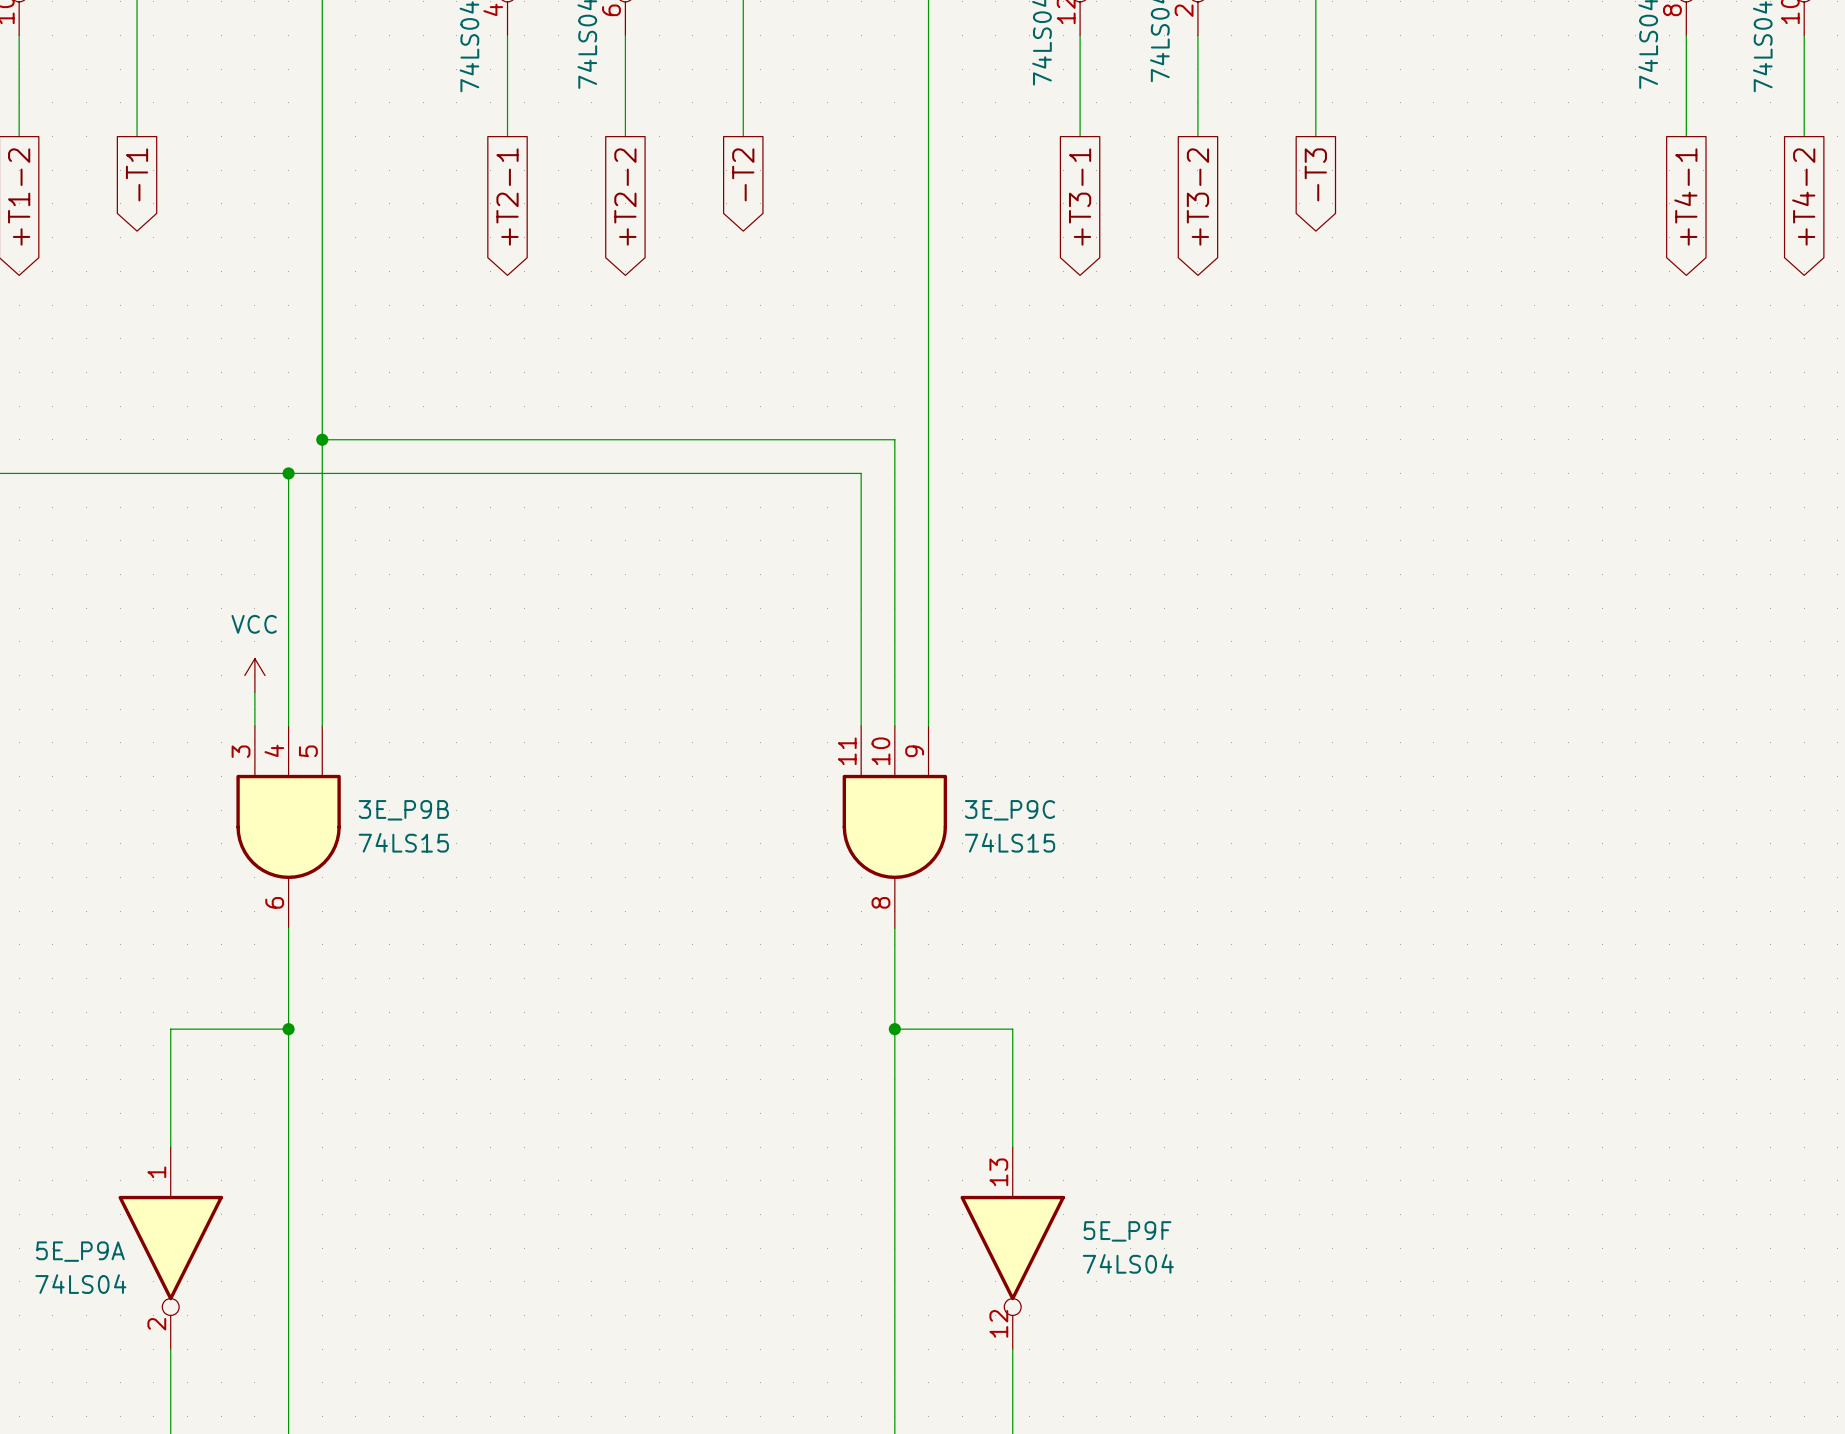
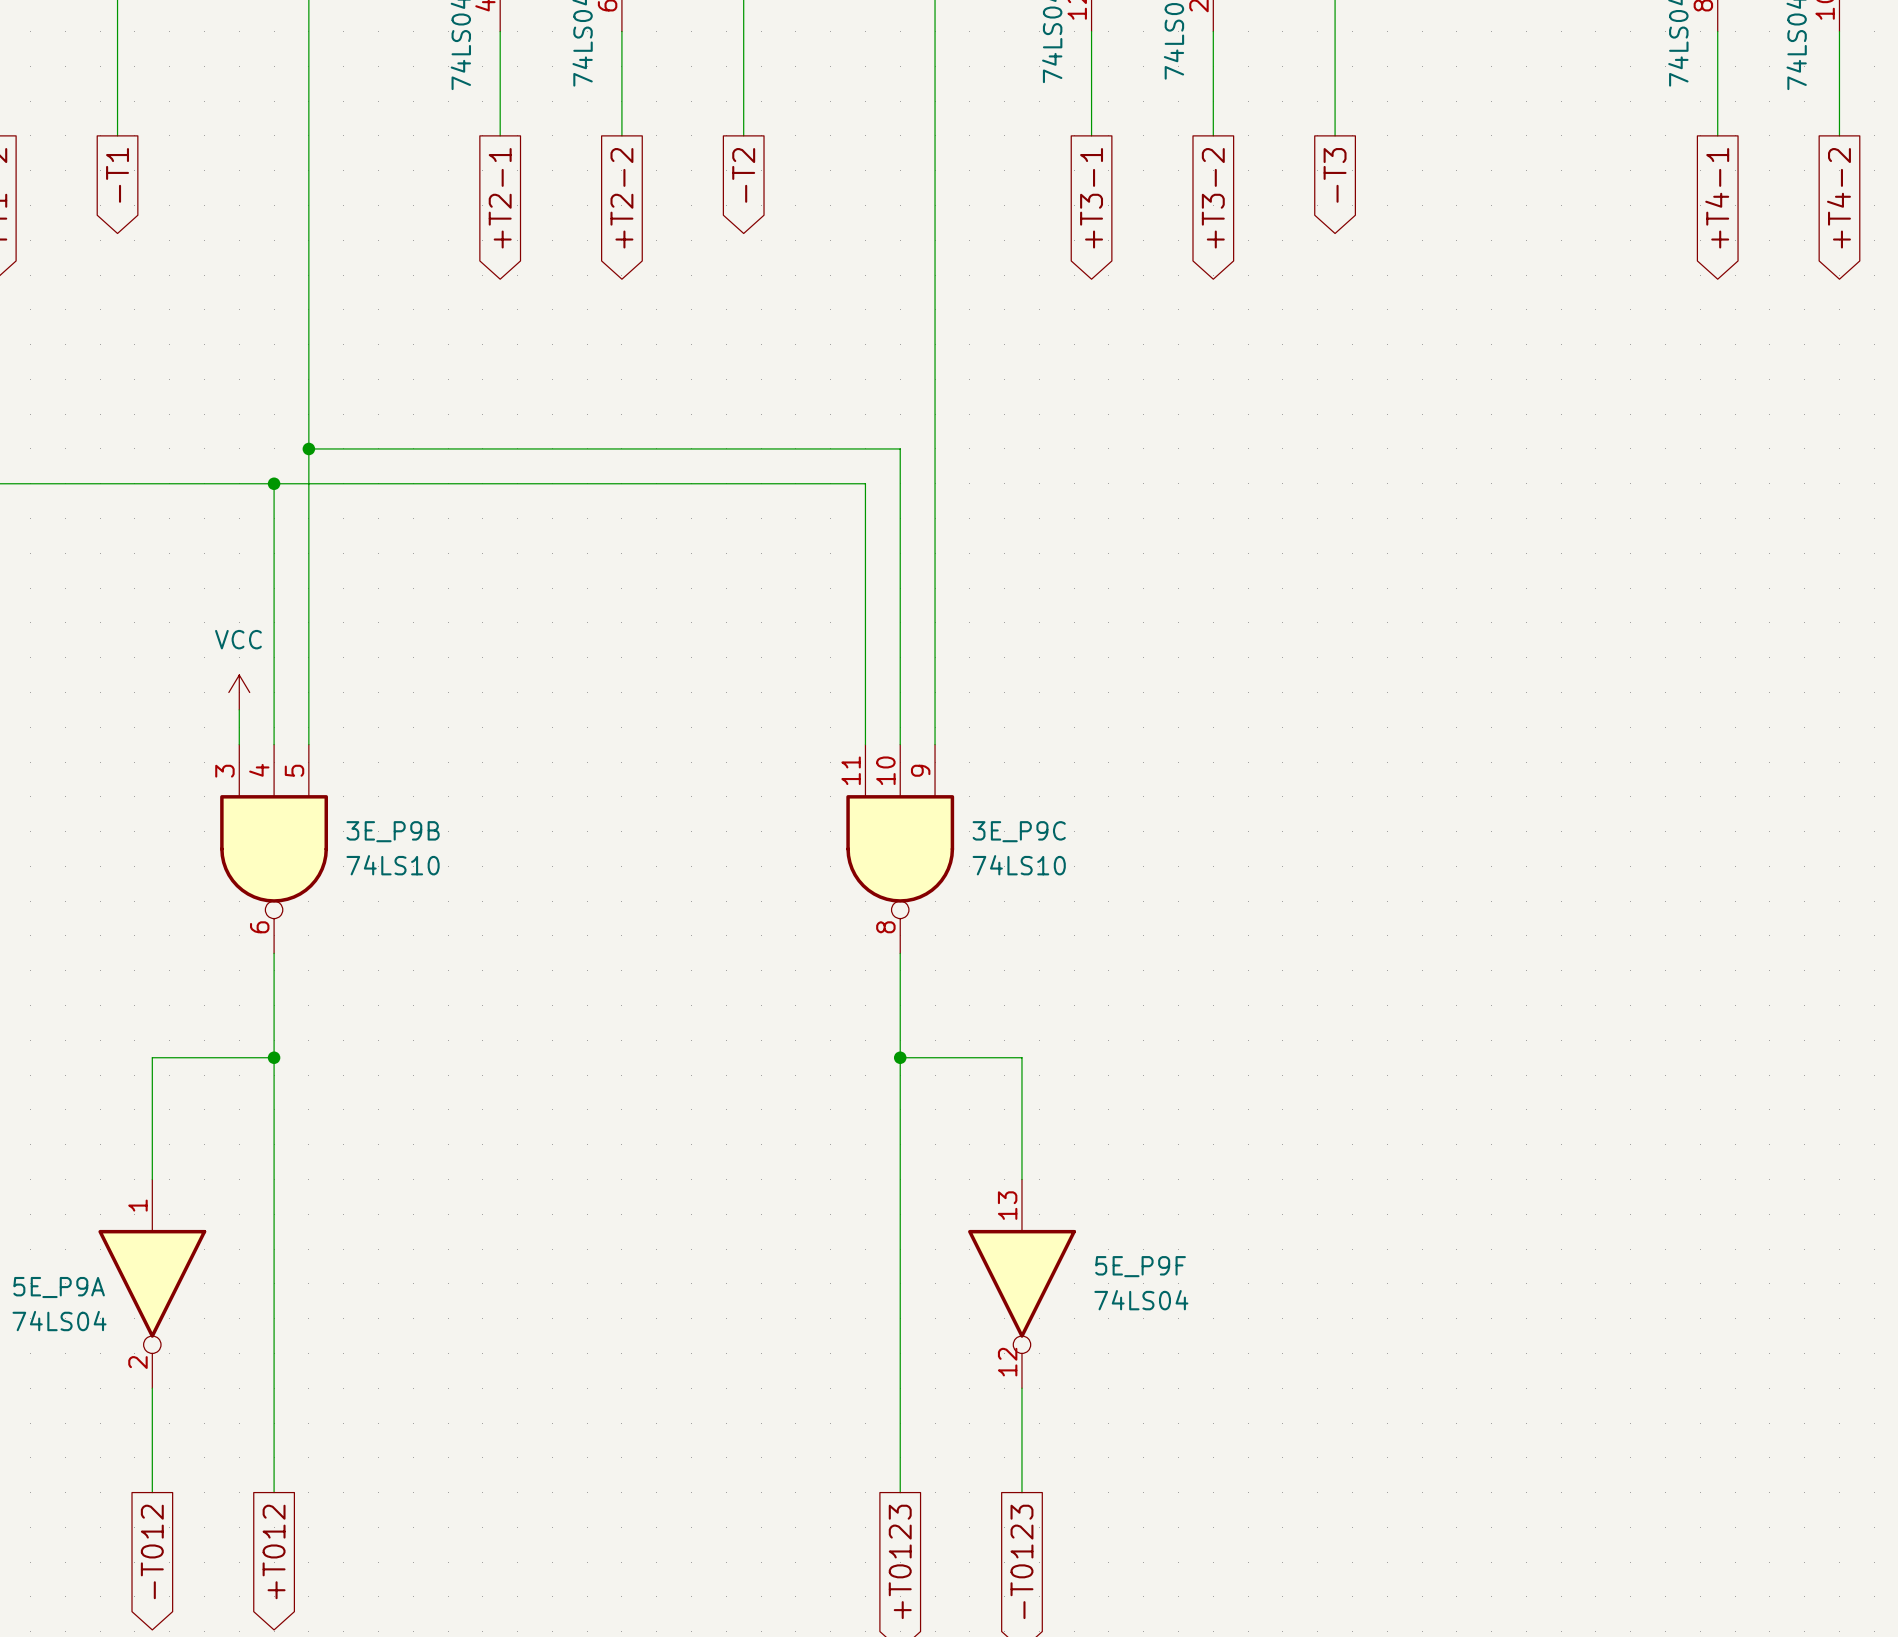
3E_P9B symbol: [236, 726, 341, 929] -> [220, 744, 328, 954]
3E_P9C symbol: [842, 726, 948, 929] -> [846, 744, 955, 954]
3E_P9B value: 74LS15 (403, 842) -> 74LS10 (393, 865)
3E_P9C value: 74LS15 (1010, 842) -> 74LS10 (1019, 865)

